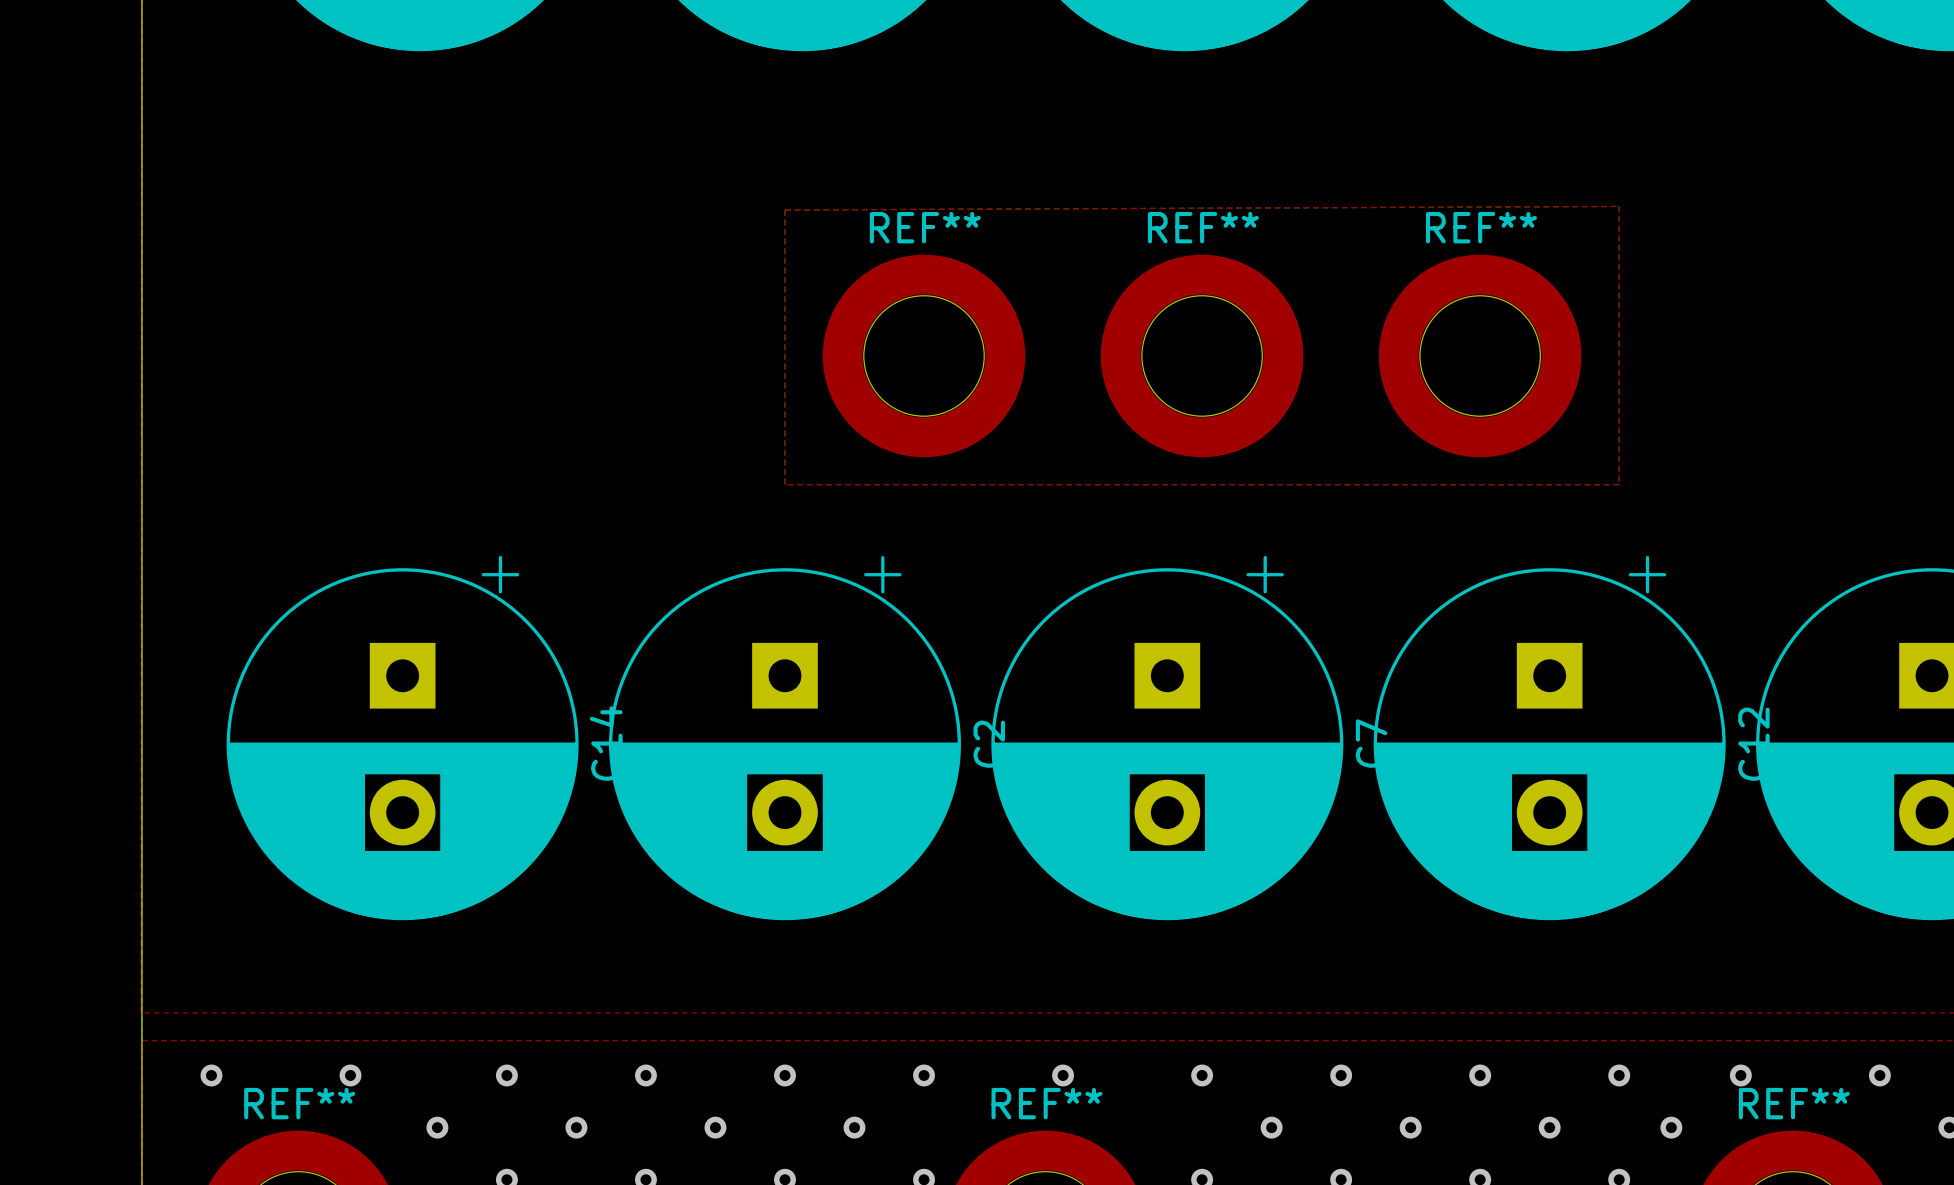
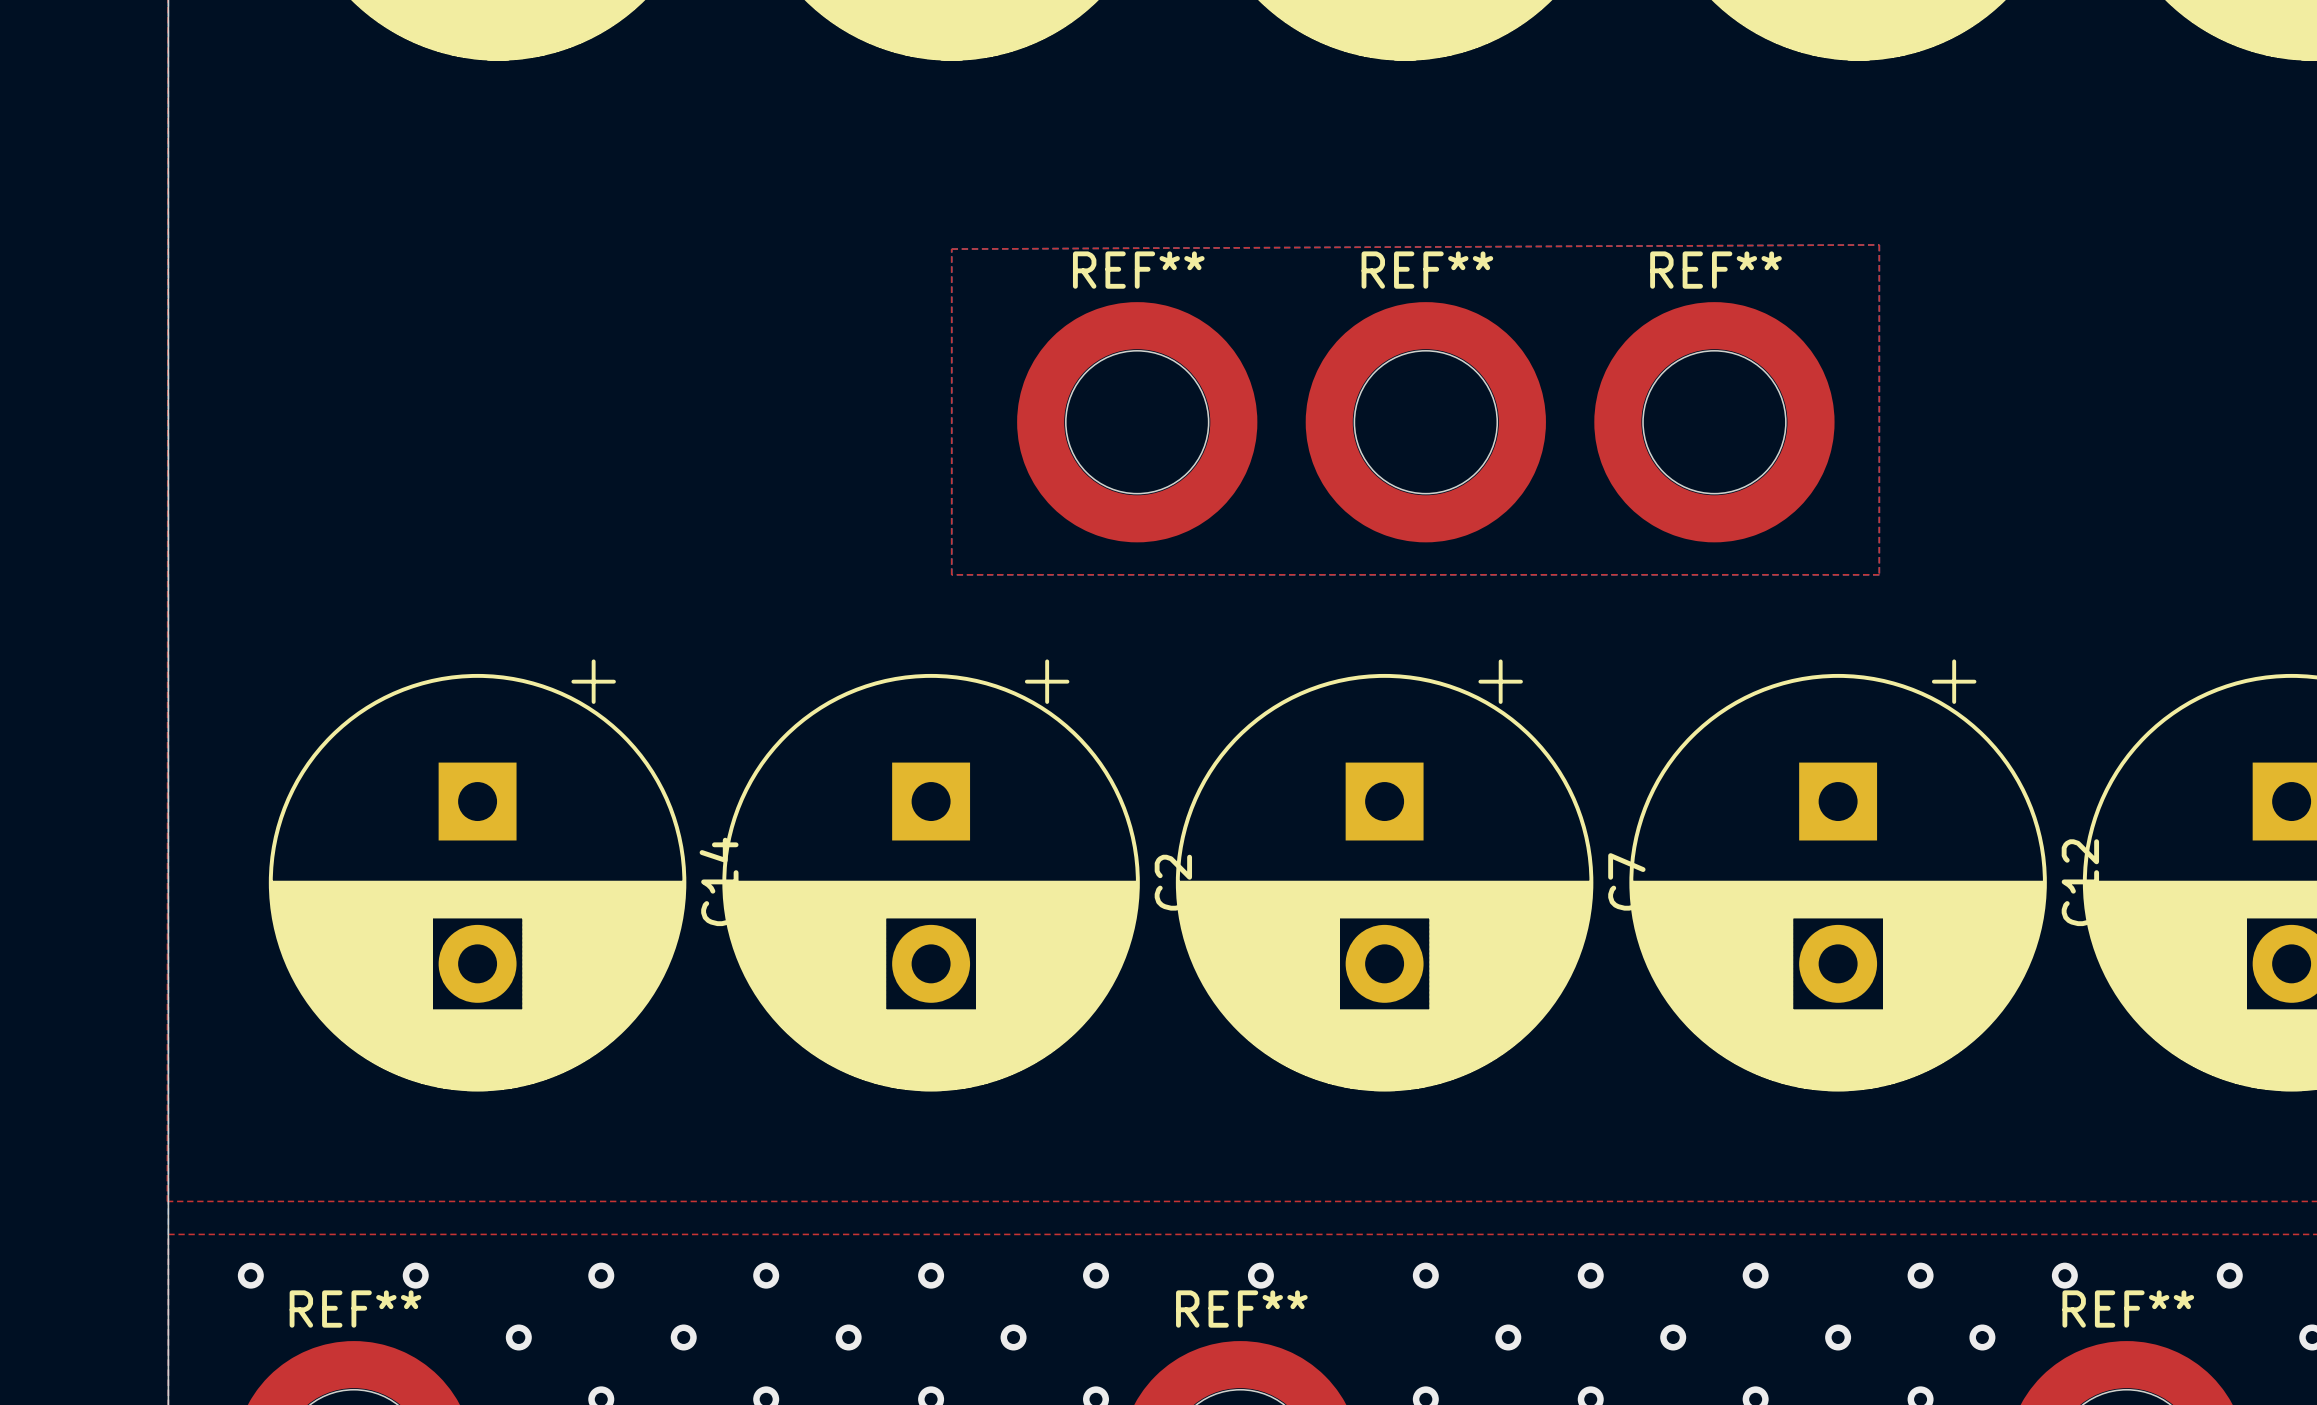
top zone outline: (1619, 206) (784, 209) (784, 484) (1619, 484) (1619, 206) -> (1879, 244) (951, 249) (951, 574) (1879, 574) (1879, 244)
REF** position: (924, 355) -> (1137, 422)
REF** position: (1480, 355) -> (1714, 422)

